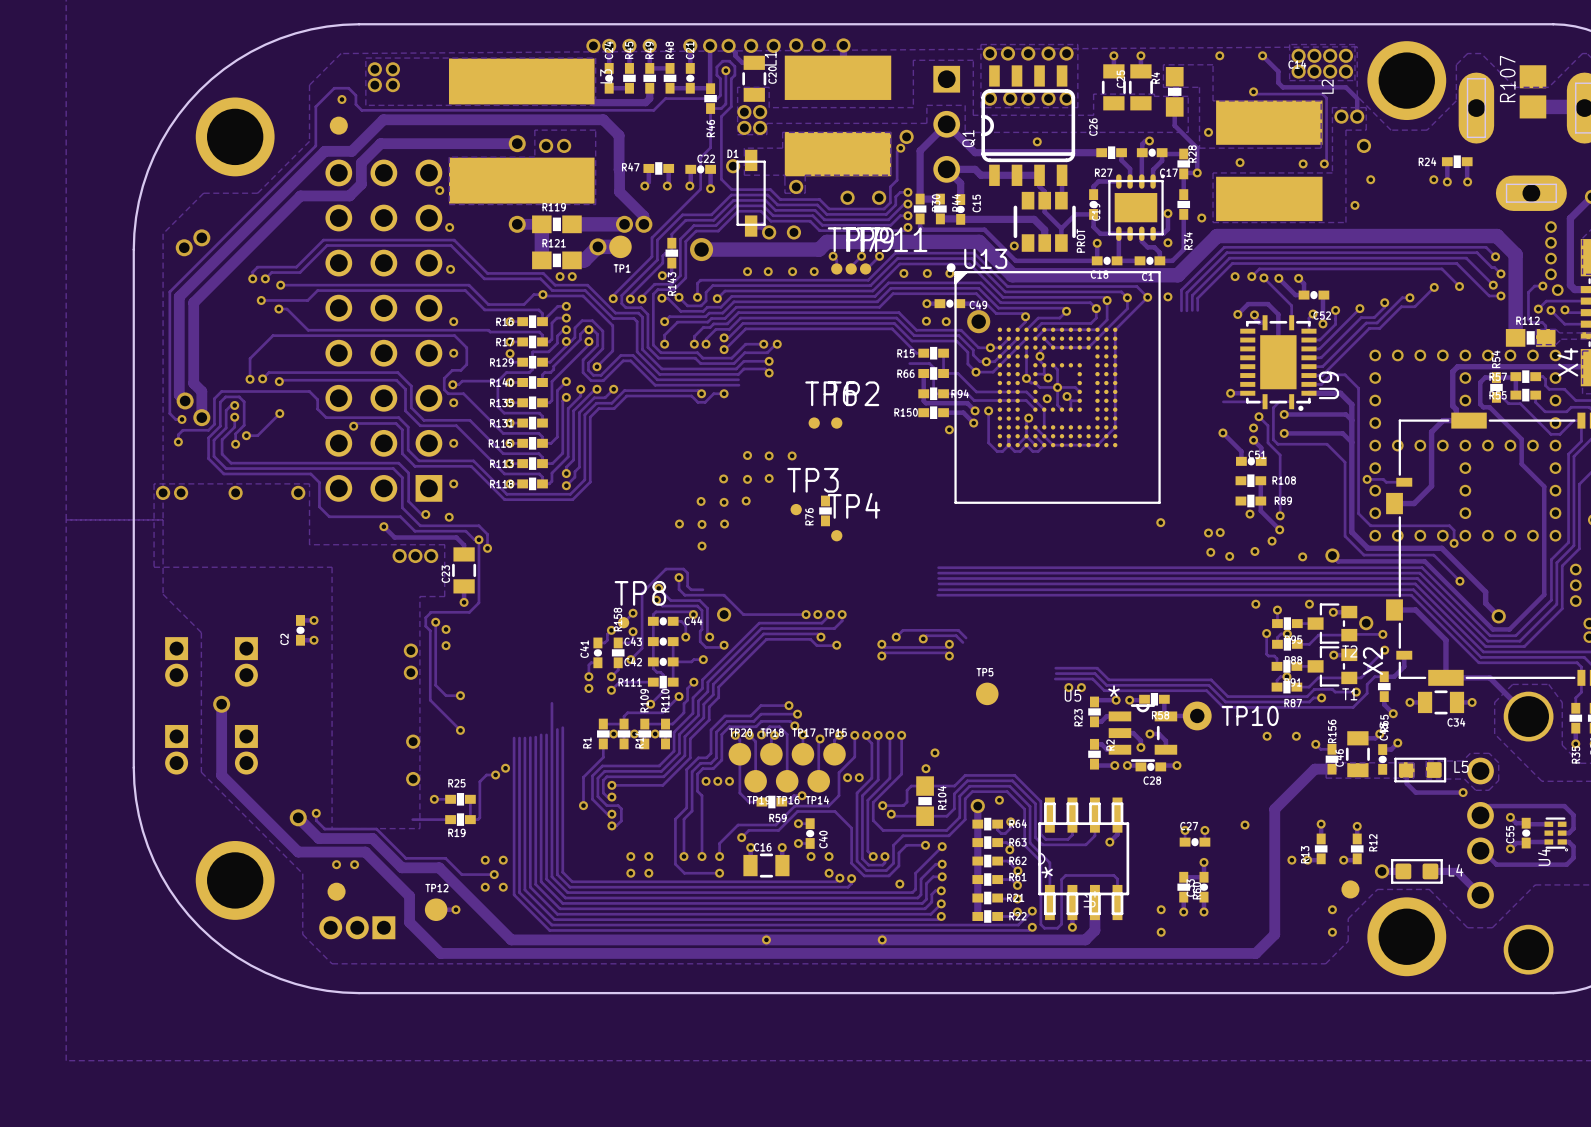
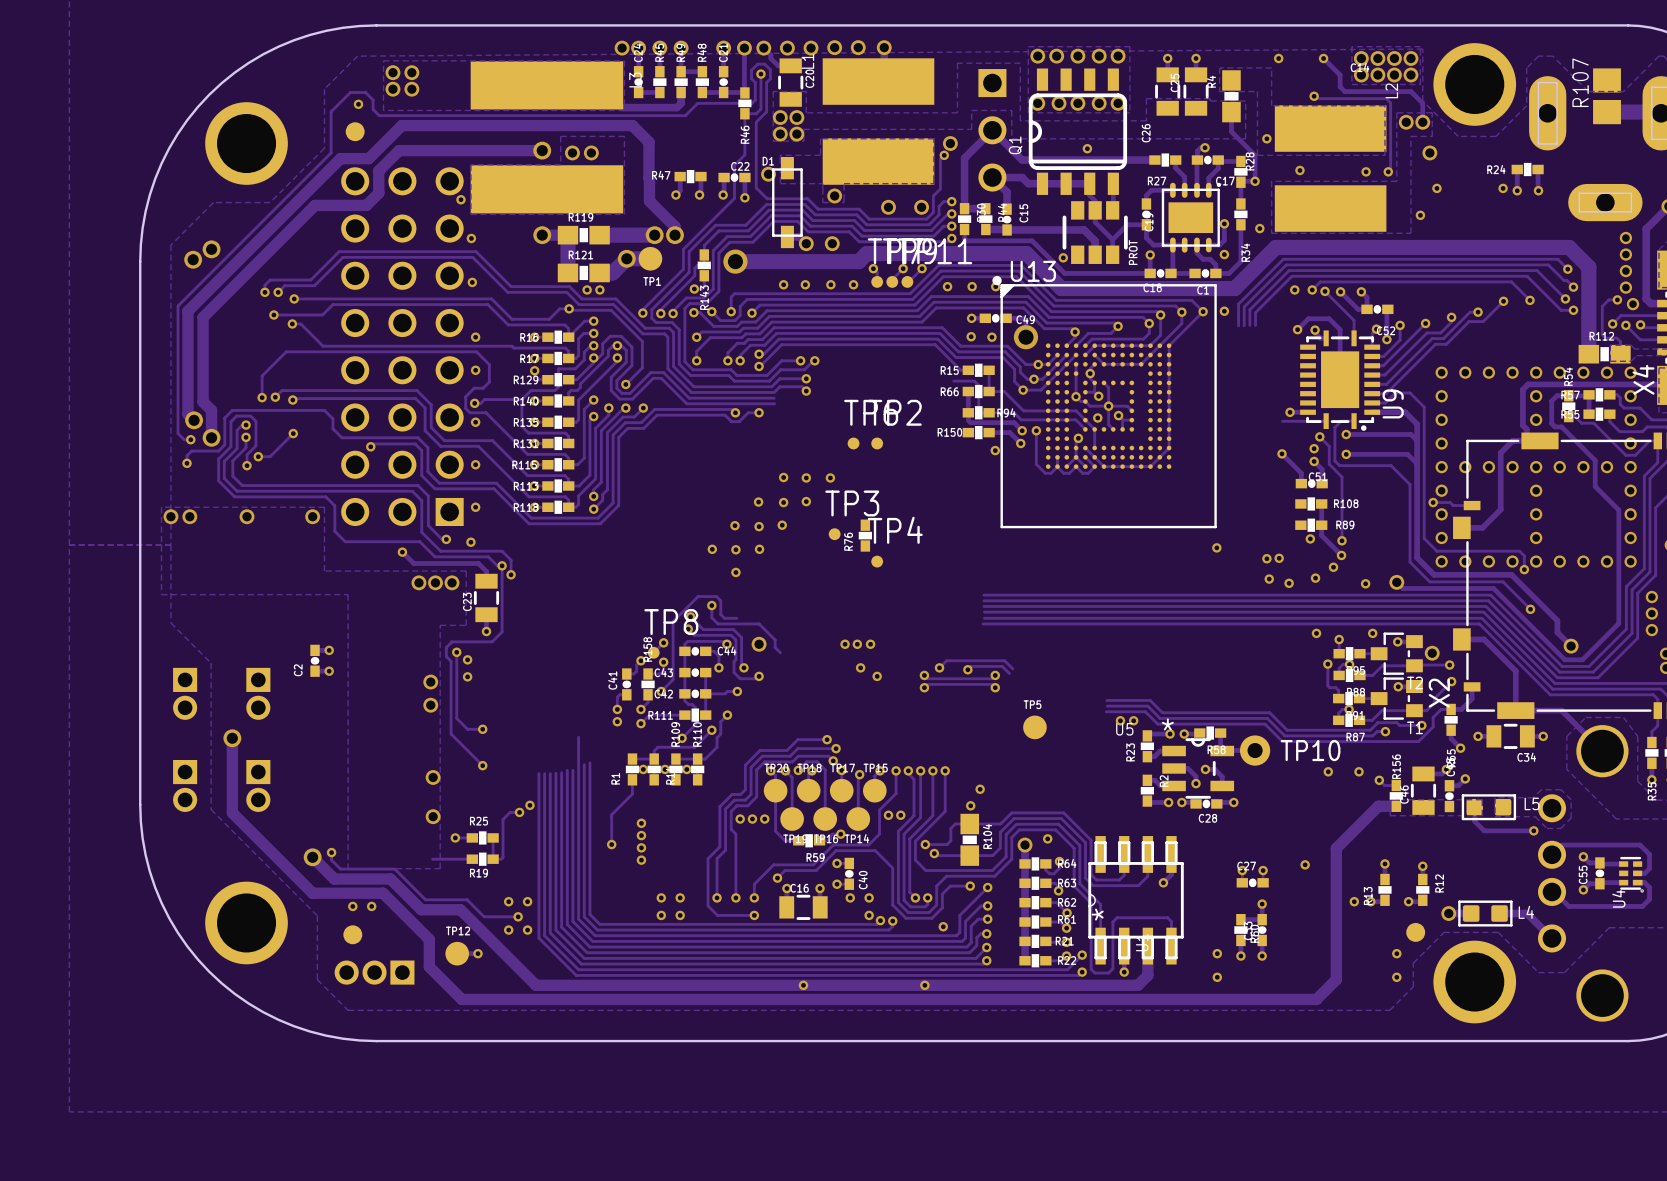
track: (739, 610) (743, 614) (806, 614) -> (775, 640) (775, 647) (780, 652)
track: (830, 614) (821, 623) (759, 623) (702, 679) (702, 688) (693, 697) (693, 713) (674, 732) (674, 751) (659, 765) (602, 765) (592, 775) (592, 799) (607, 814) (611, 814) -> none
track: (842, 614) (842, 620) (834, 628) (761, 628) (707, 682) (707, 691) (698, 701) (698, 715) (679, 734) (679, 753) (661, 771) (604, 771) (597, 778) (597, 796) (606, 805) (618, 805) (621, 808) (621, 820) (616, 825) (611, 825) -> none
via: (842, 614) -> none
track: (820, 637) (817, 633) (763, 633) (713, 684) (713, 694) (703, 704) (703, 717) (684, 736) (684, 755) (663, 776) (606, 776) (603, 780) (603, 793) (607, 797) (611, 797) -> none
track: (836, 645) (816, 645) (810, 639) (766, 639) (718, 687) (718, 697) (709, 706) (709, 720) (690, 738) (690, 757) (662, 785) (611, 785) -> none
via: none -> (641, 847)
via: (611, 814) -> none
via: none -> (641, 860)
via: (611, 825) -> none

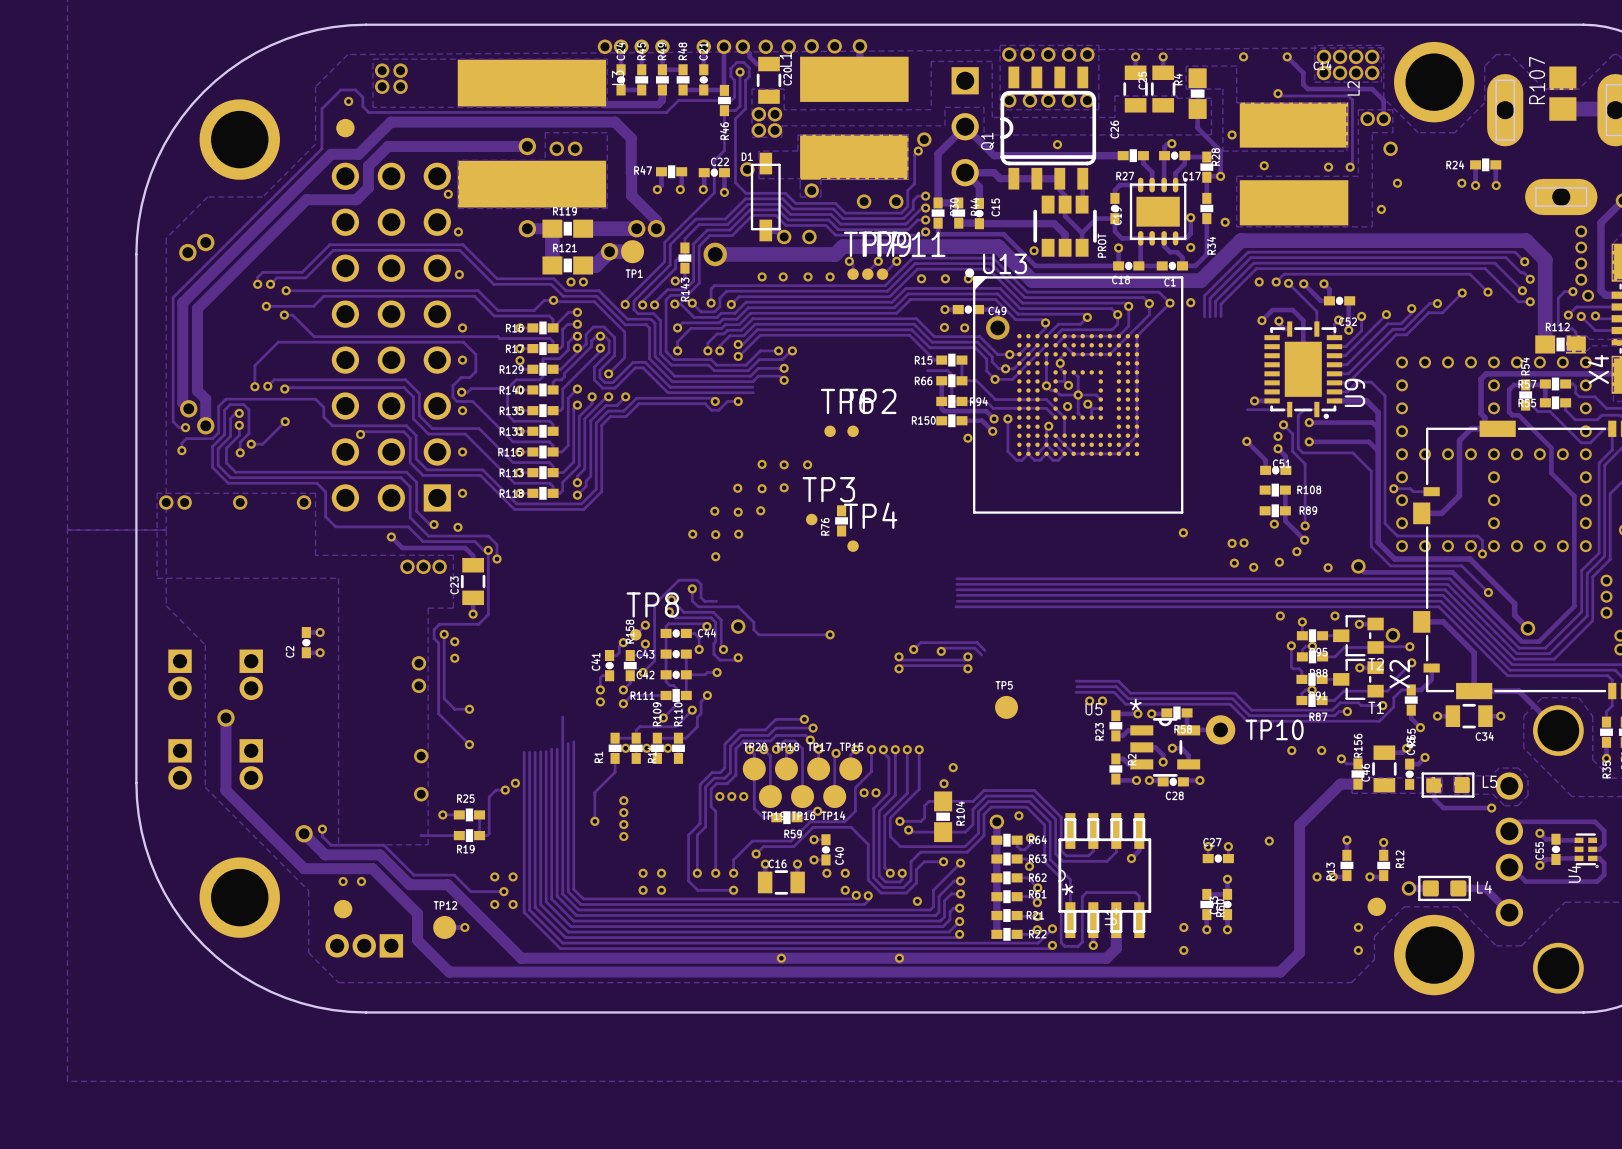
via: (845, 644) -> none
via: (857, 644) -> none
via: (870, 644) -> none
track: none -> (830, 634) (758, 634)
via: none -> (830, 634)
via: (860, 667) -> none
via: (877, 676) -> none

